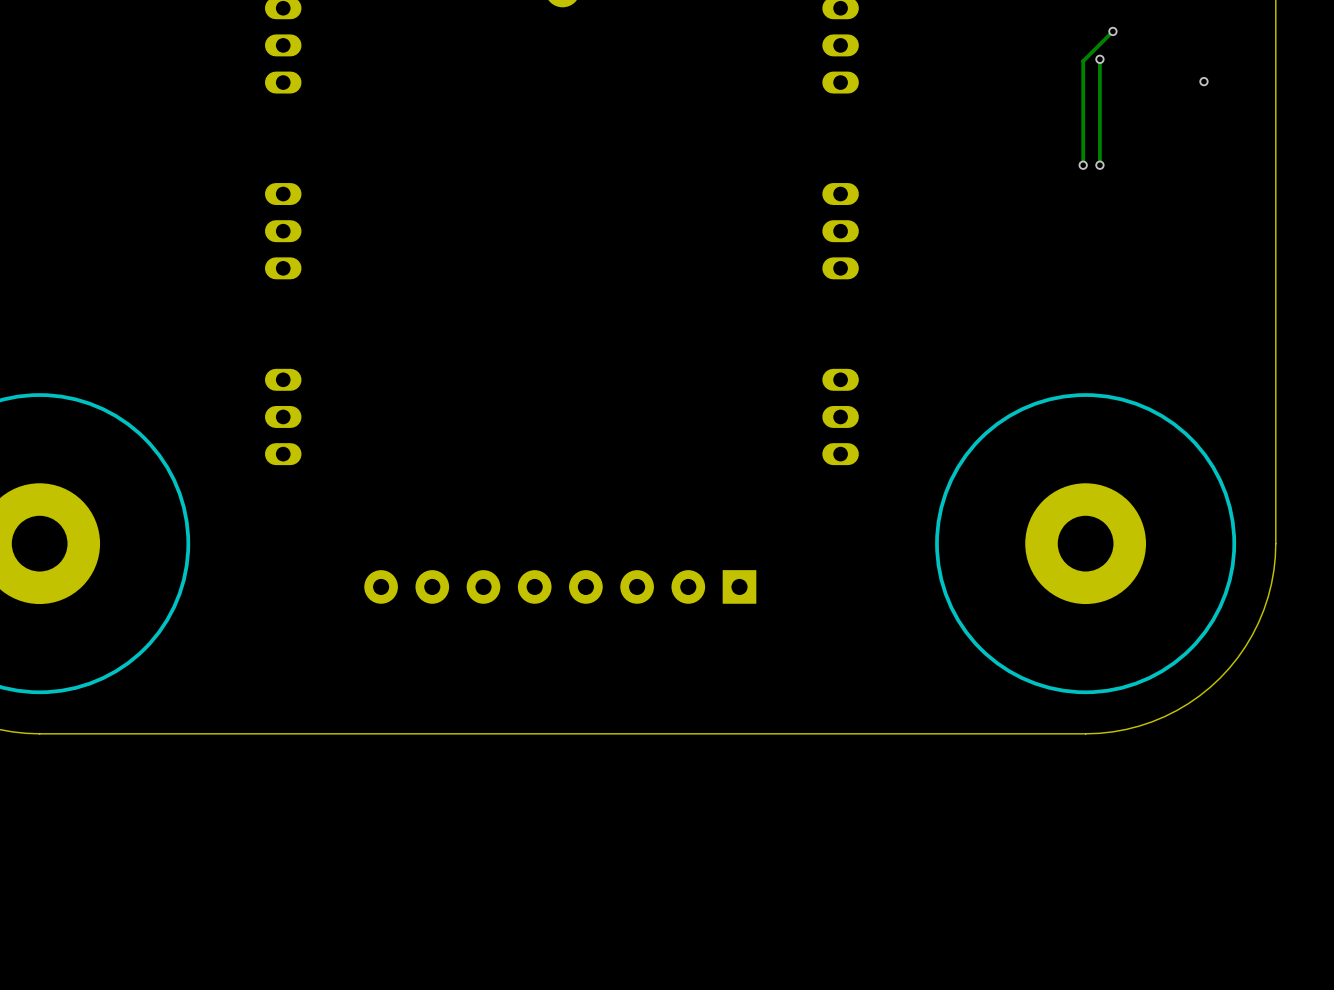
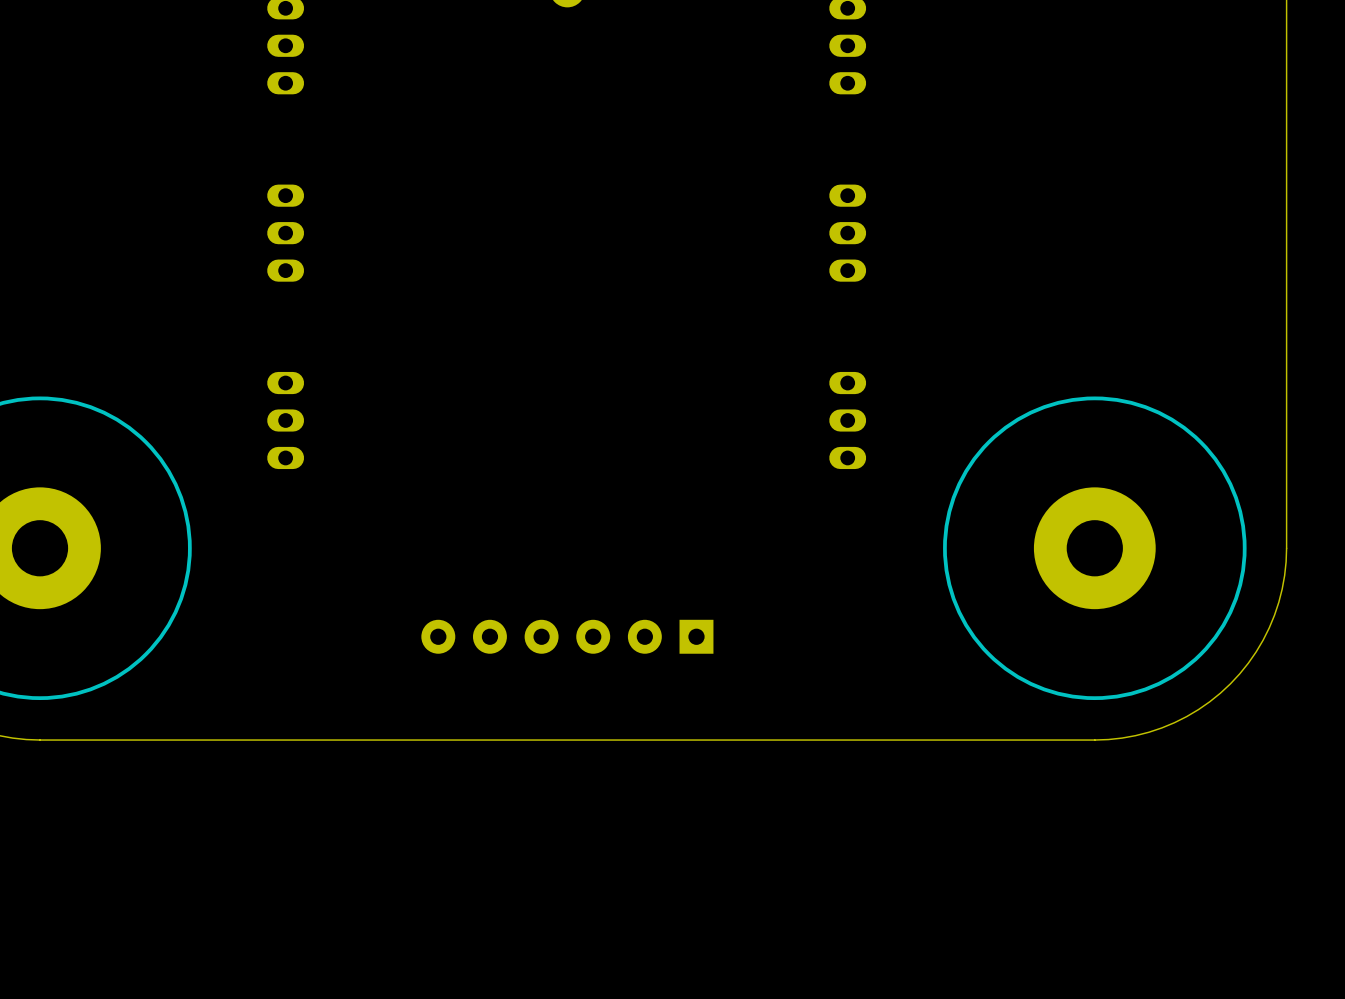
track: (1112, 31) (1083, 61) (1083, 165) -> none
via: (1112, 31) -> none
track: (1099, 59) (1099, 165) -> none
via: (1099, 59) -> none
via: (1203, 81) -> none
via: (1083, 165) -> none
via: (1099, 165) -> none
part: (560, 586) -> none
part: none -> (567, 636)

